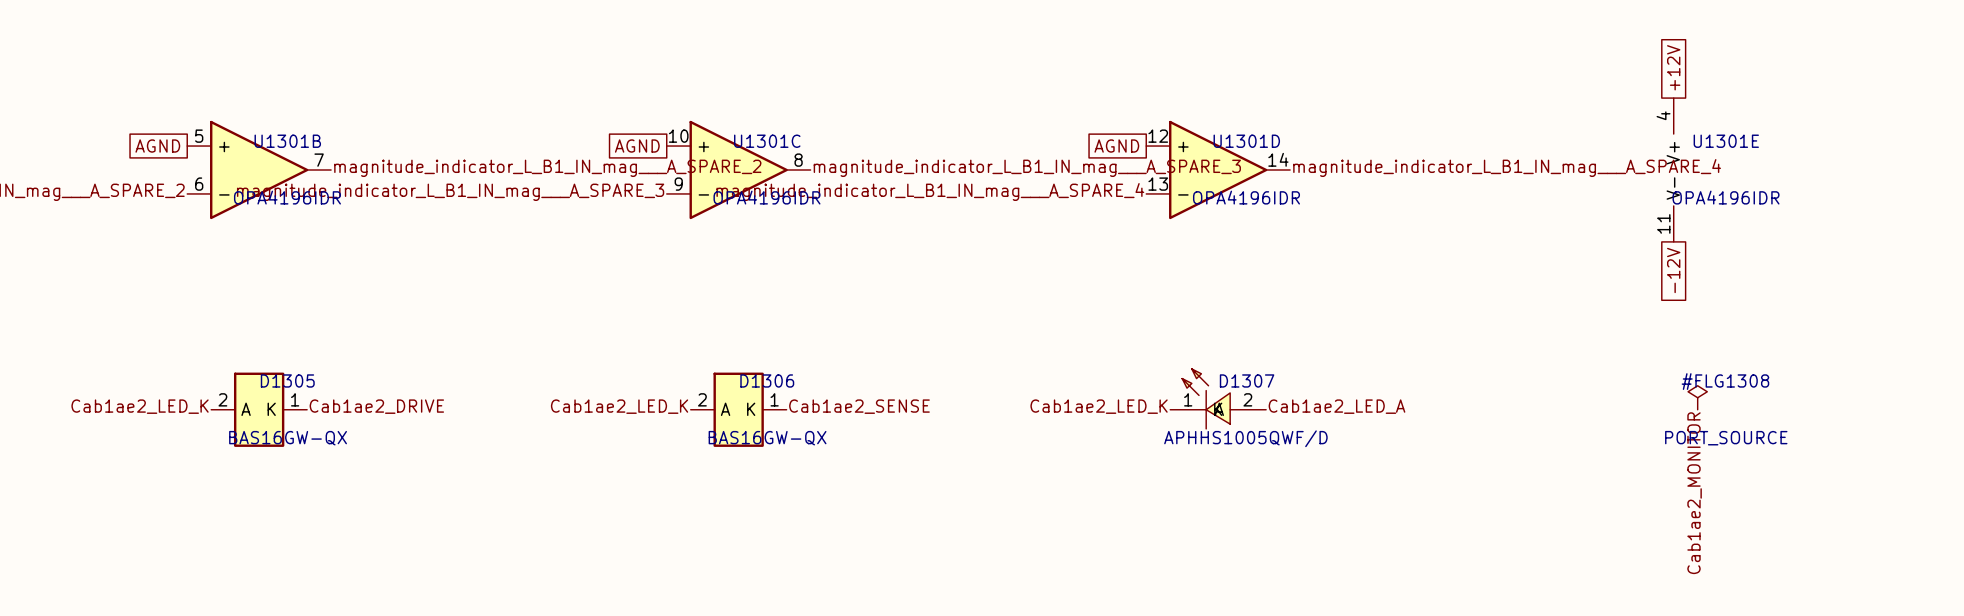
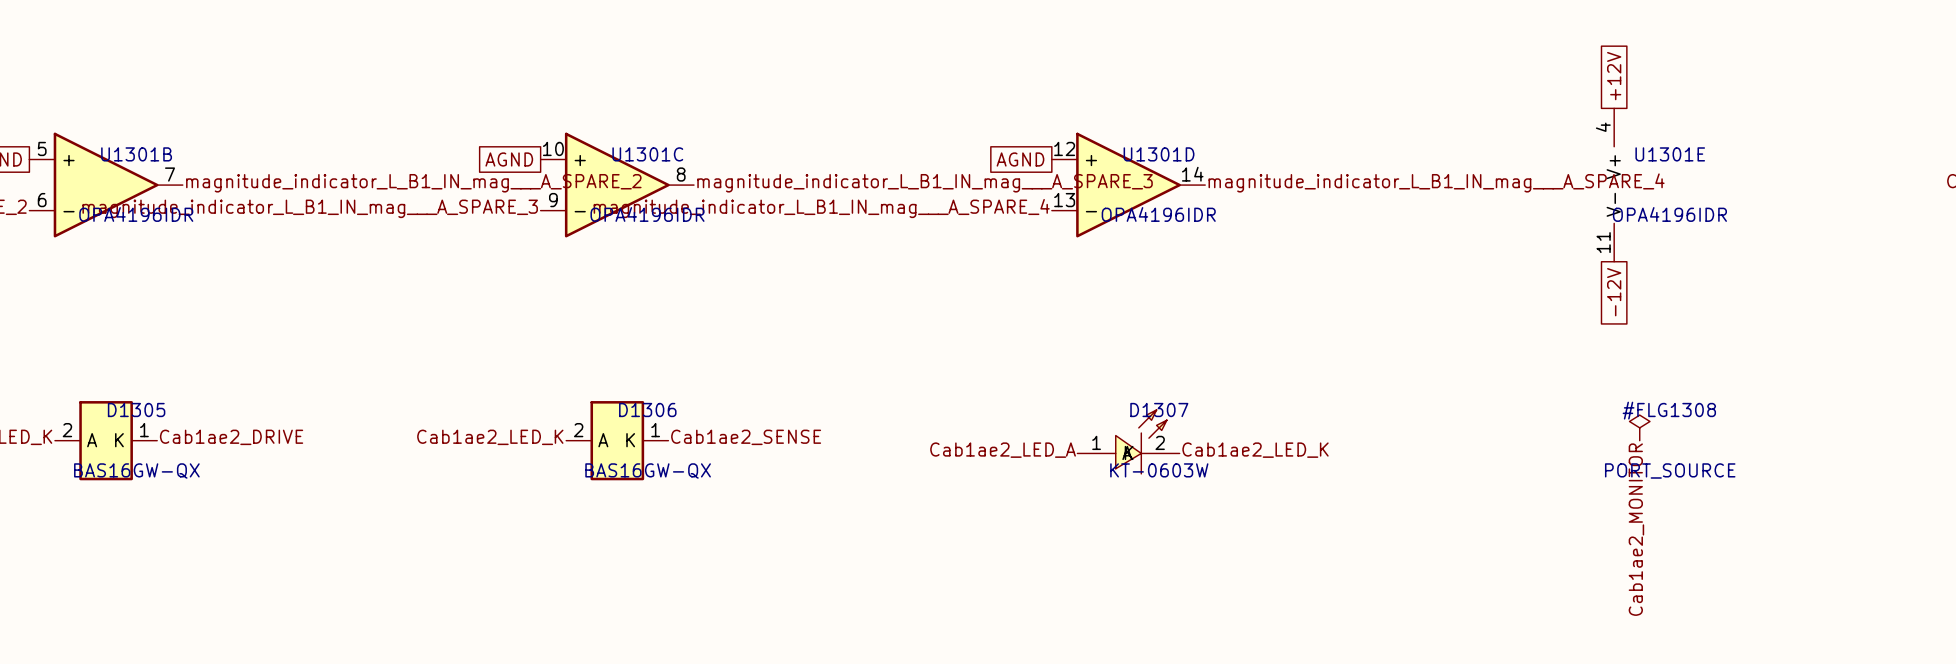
D1307 symbol: [1170, 368, 1267, 429] -> [1077, 409, 1180, 474]
label position: Cab1ae2_LED_K (1099, 406) -> Cab1ae2_LED_K (1255, 450)
label position: Cab1ae2_LED_A (1337, 406) -> Cab1ae2_LED_A (1003, 450)
D1307 value: APHHS1005QWF/D (1245, 438) -> KT-0603W (1159, 470)

